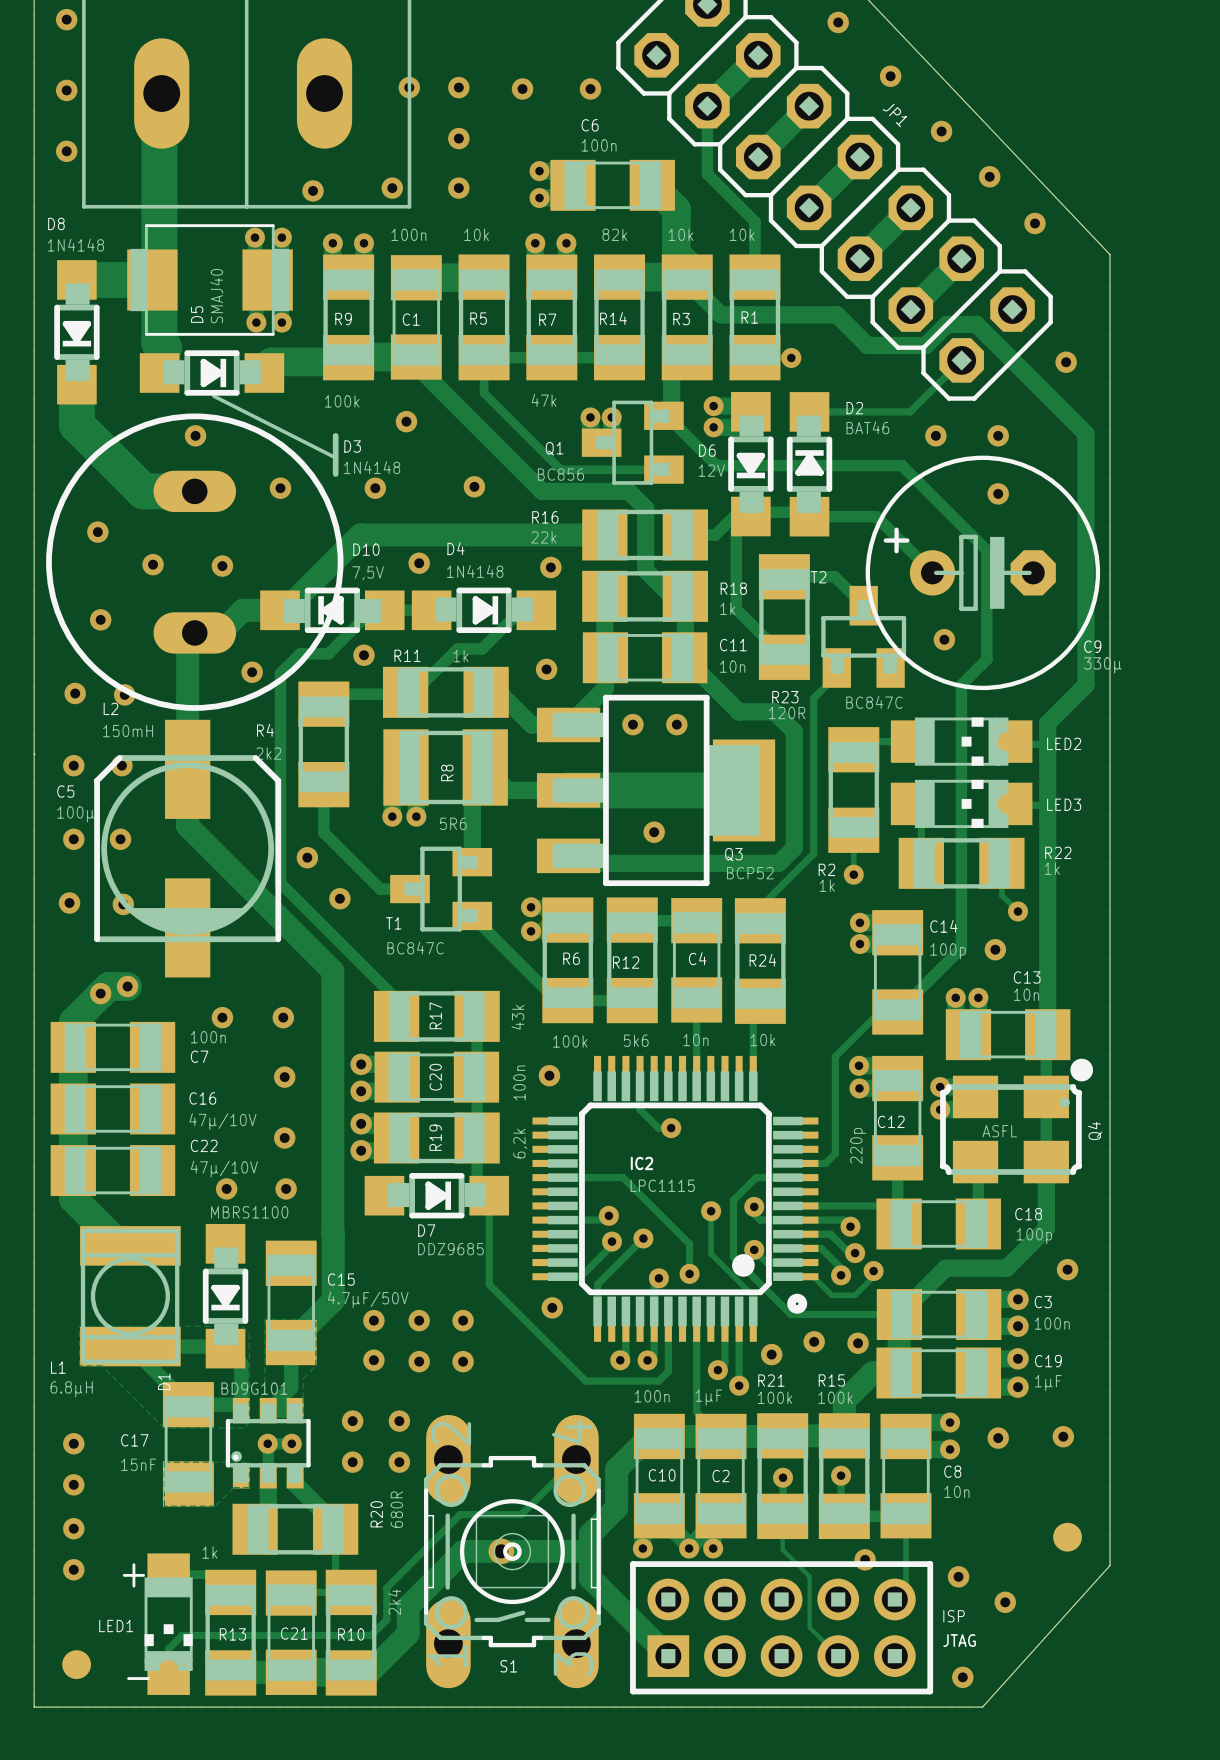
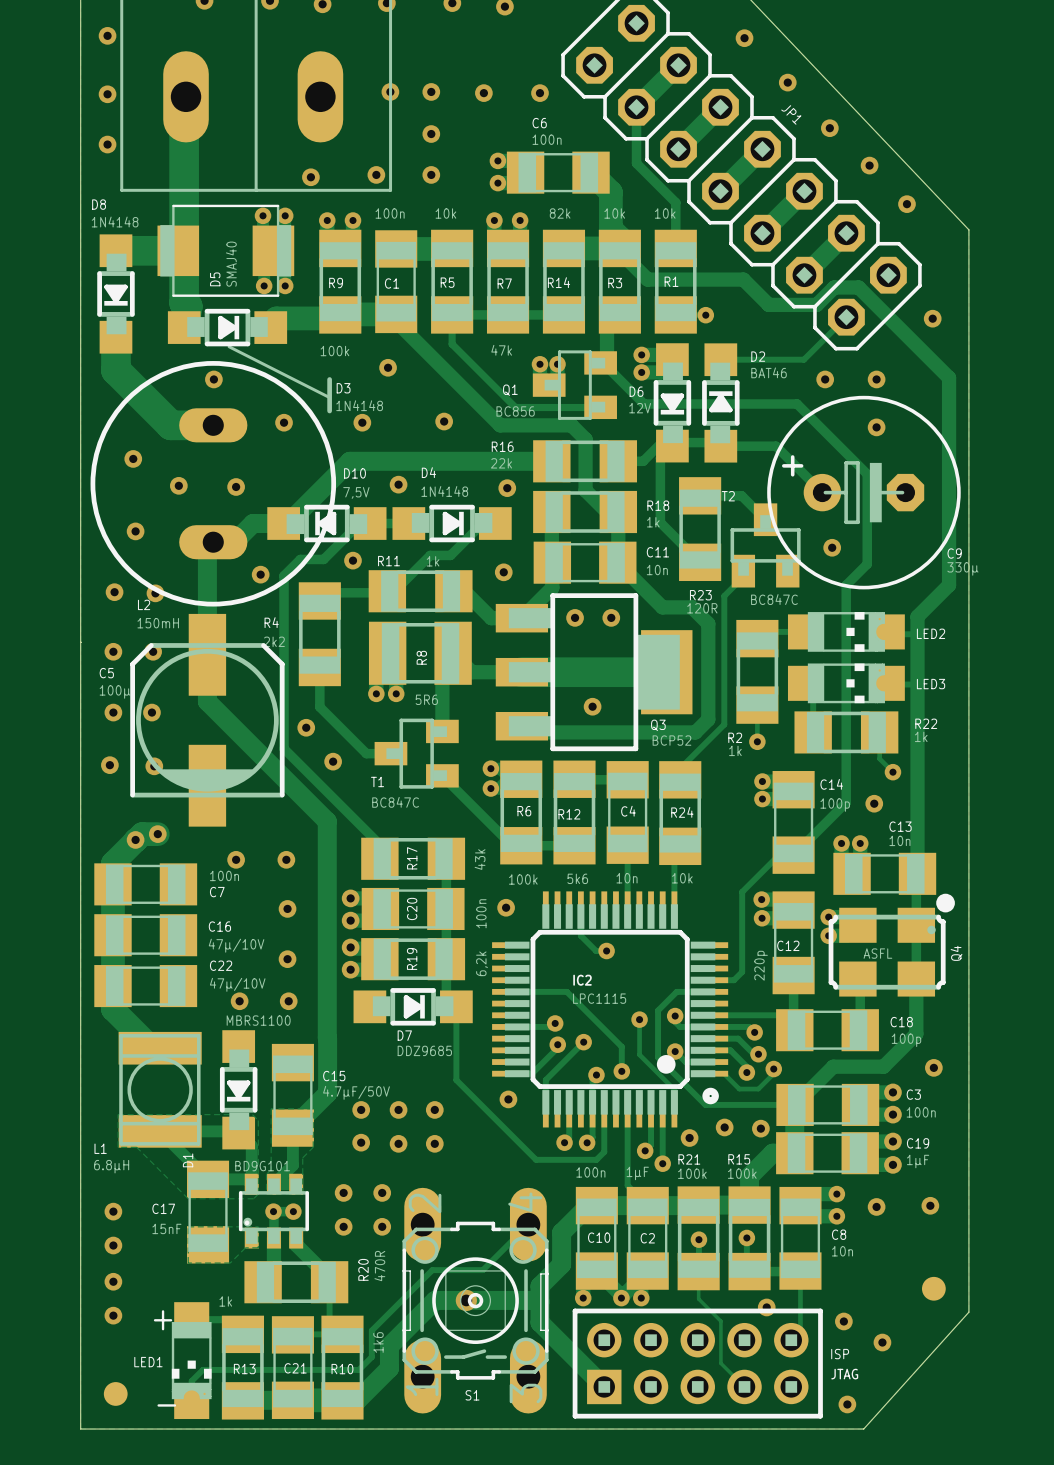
R20 value: 680R (396, 1509) -> 470R (379, 1266)
R10 value: 2k4 (394, 1602) -> 1k6 (378, 1342)

